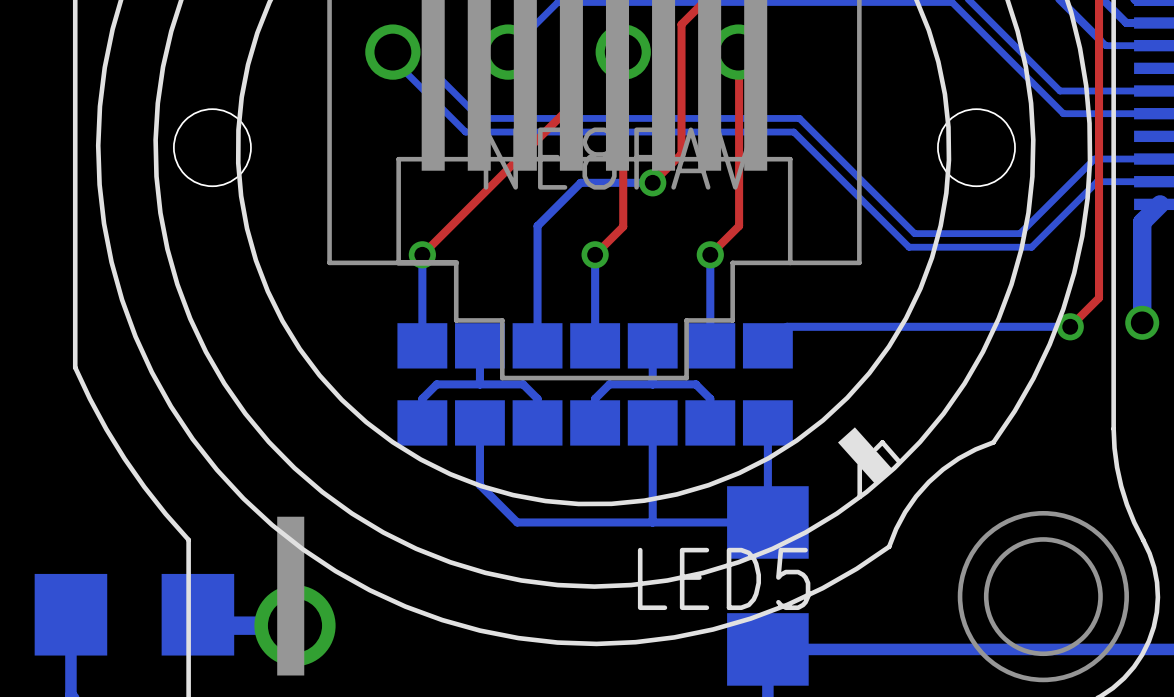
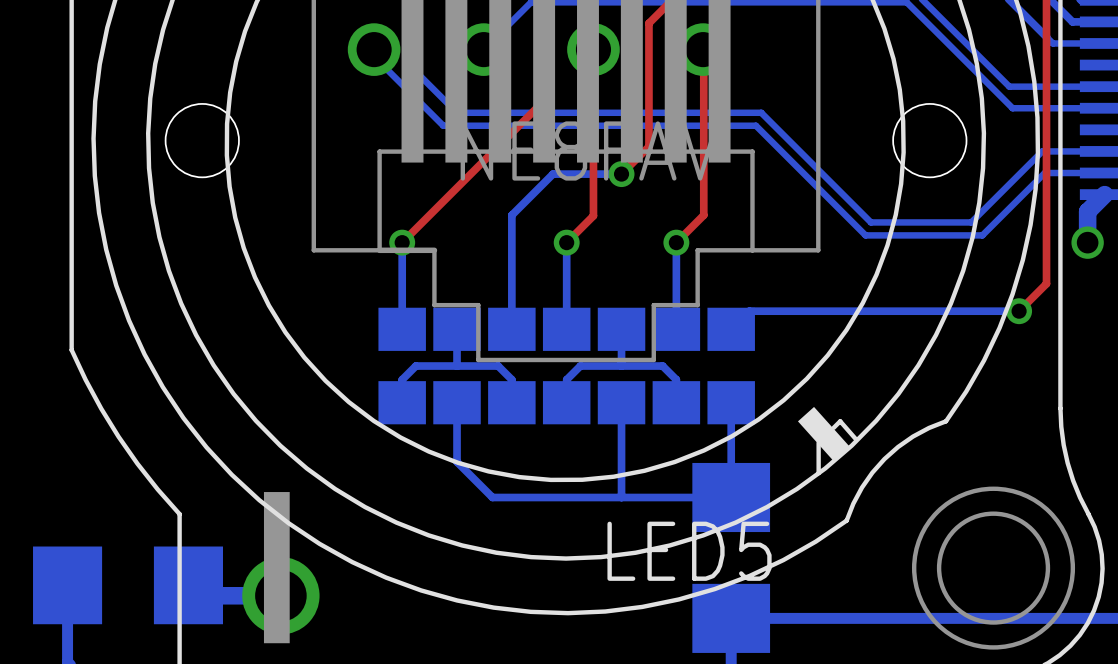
bottom track: (1142, 254) (1142, 322) -> none
via position: (1142, 322) -> (1087, 242)

